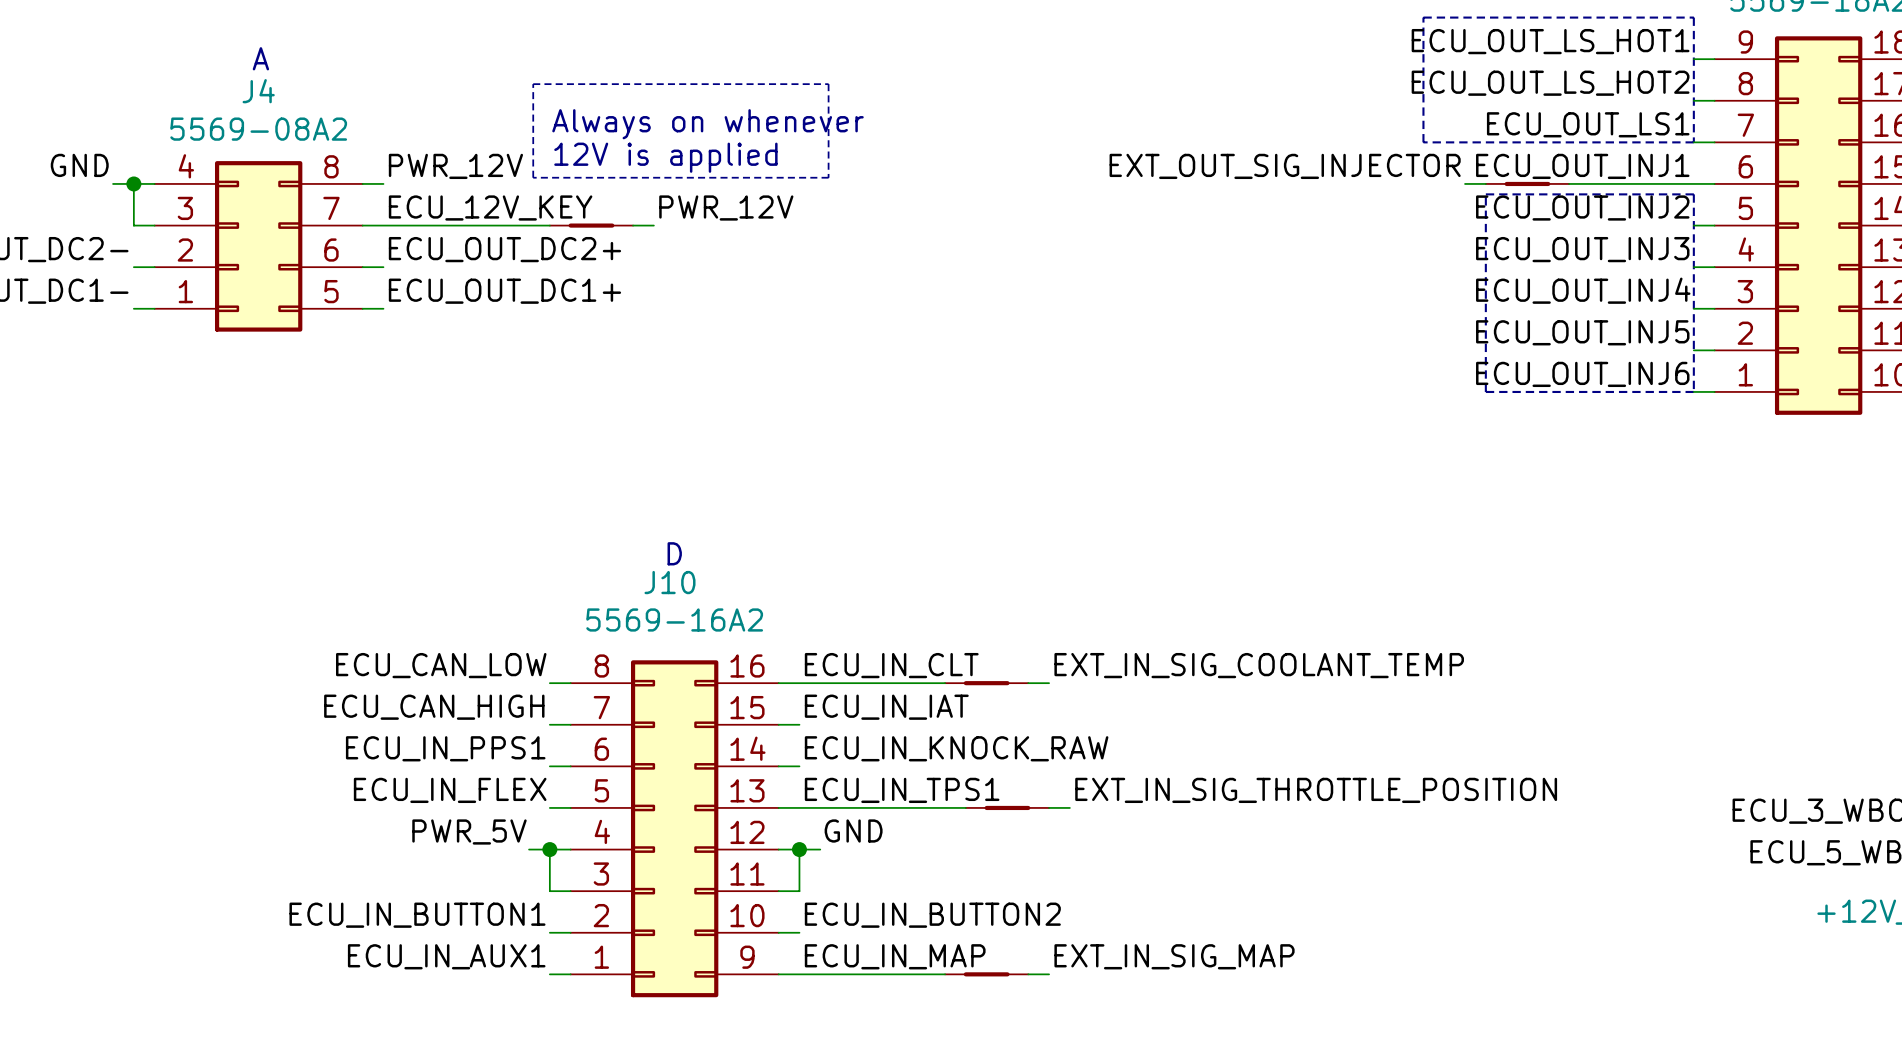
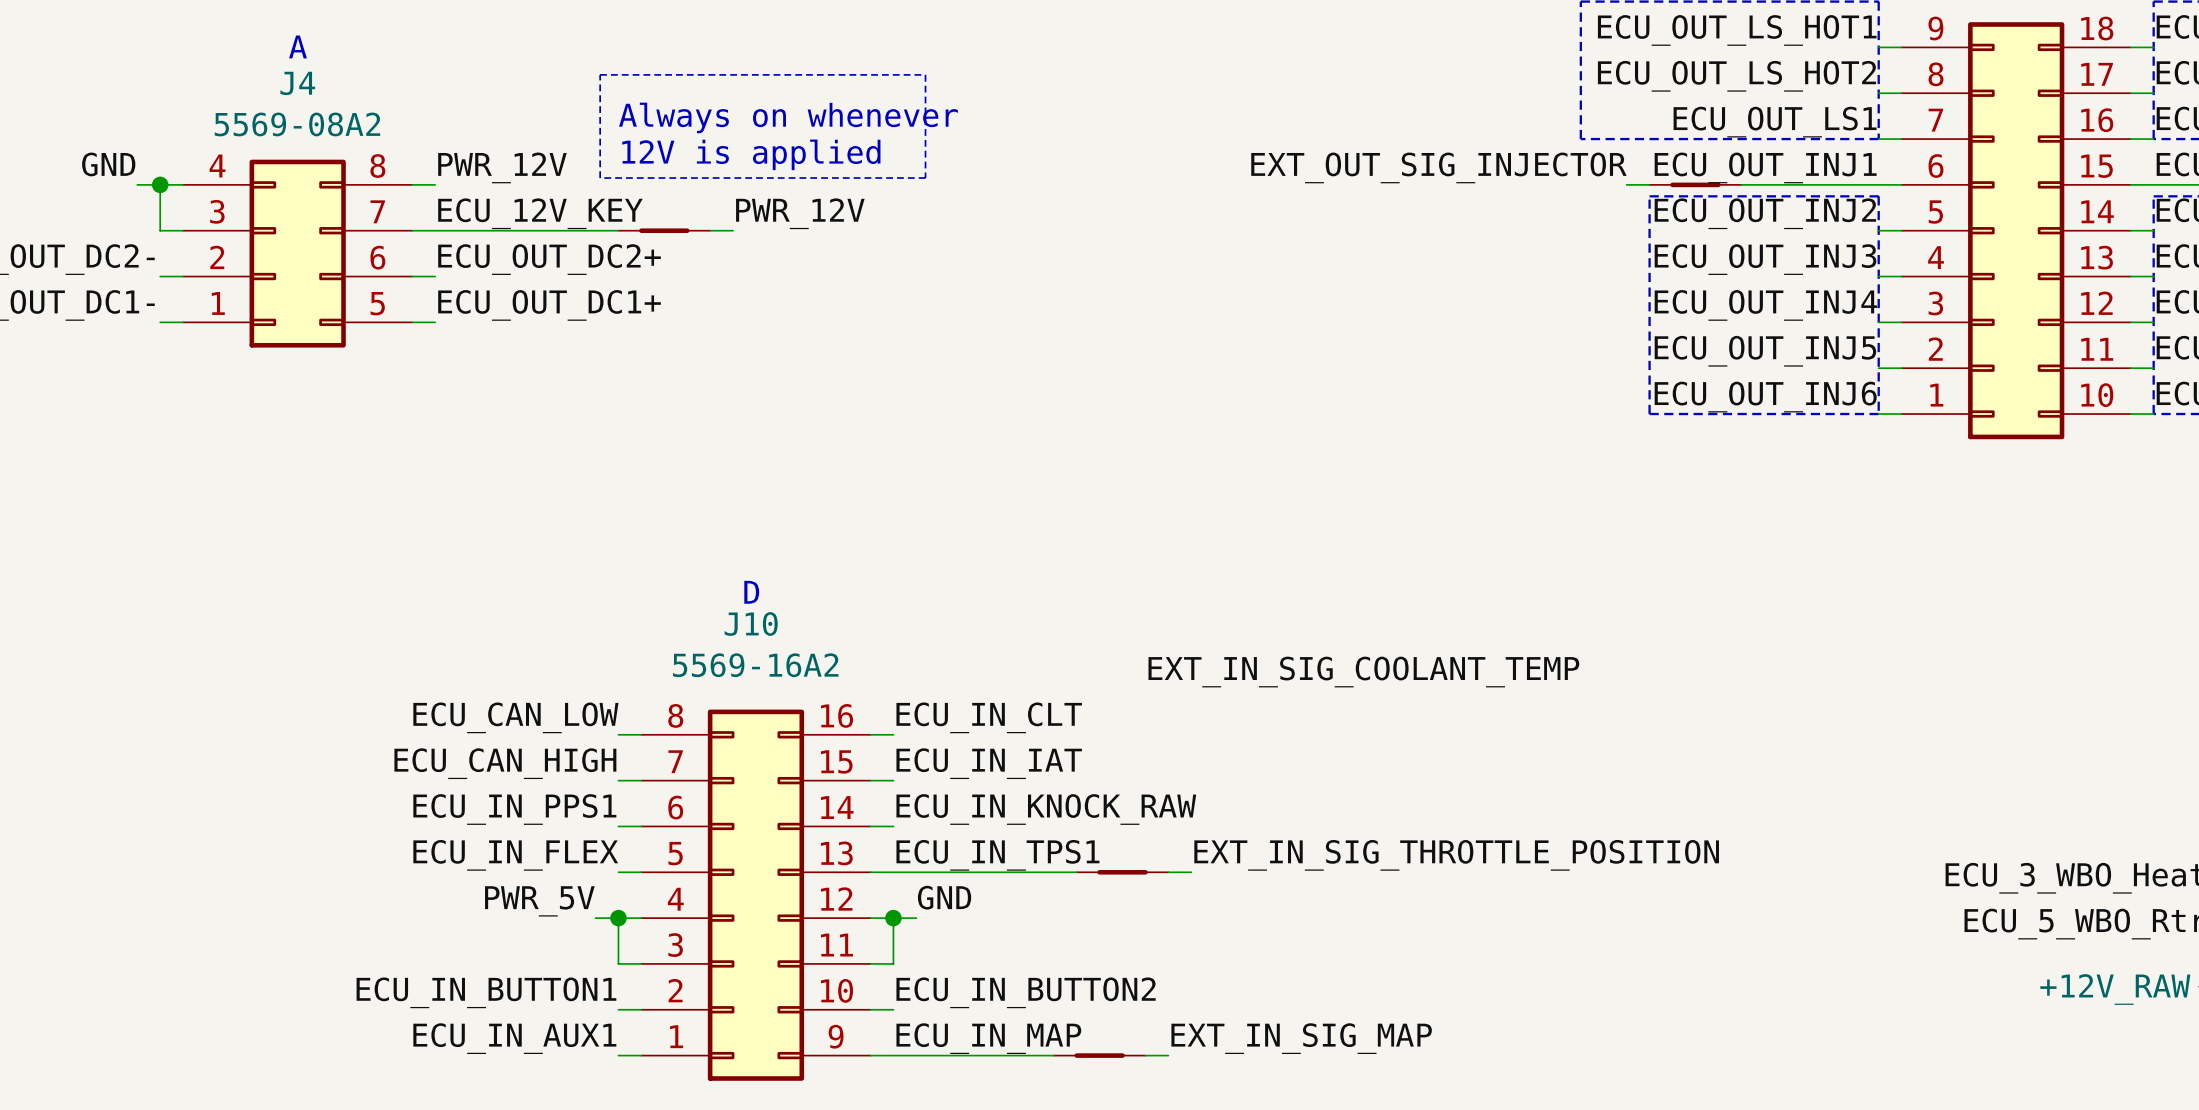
label position: EXT_IN_SIG_COOLANT_TEMP (1259, 665) -> EXT_IN_SIG_COOLANT_TEMP (1363, 672)
wire: (799, 683) (945, 683) -> none
part: (986, 683) -> none
wire: (1028, 683) (1049, 683) -> none

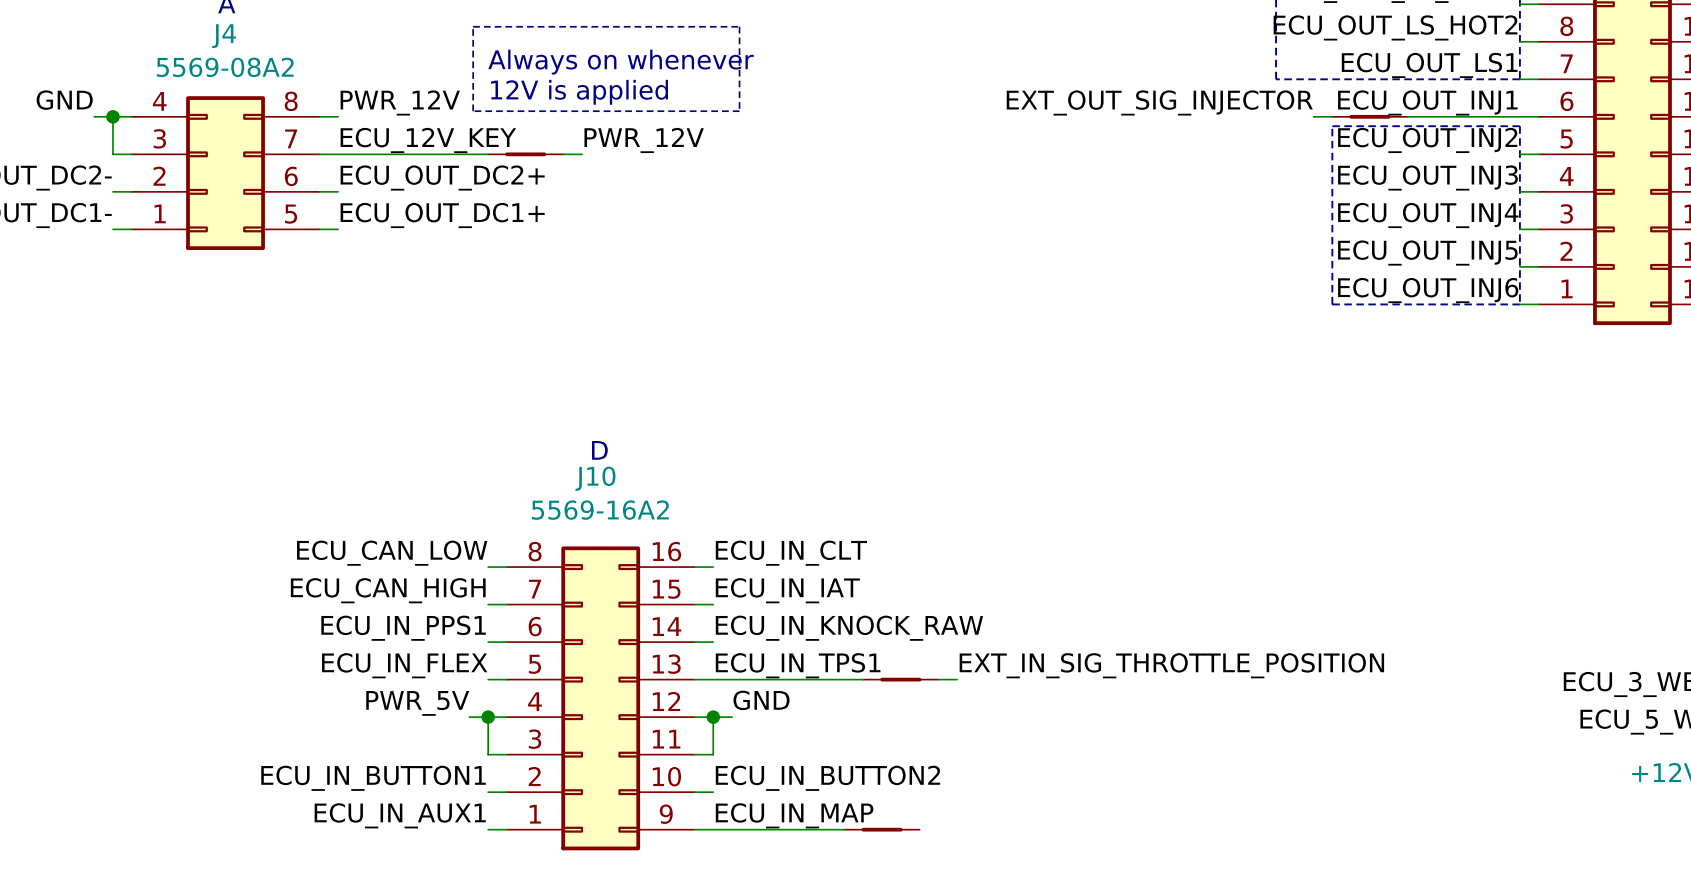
label: EXT_IN_SIG_COOLANT_TEMP (1363, 672) -> none
label: EXT_IN_SIG_MAP (1301, 1038) -> none
wire: (1145, 1055) (1168, 1055) -> none

